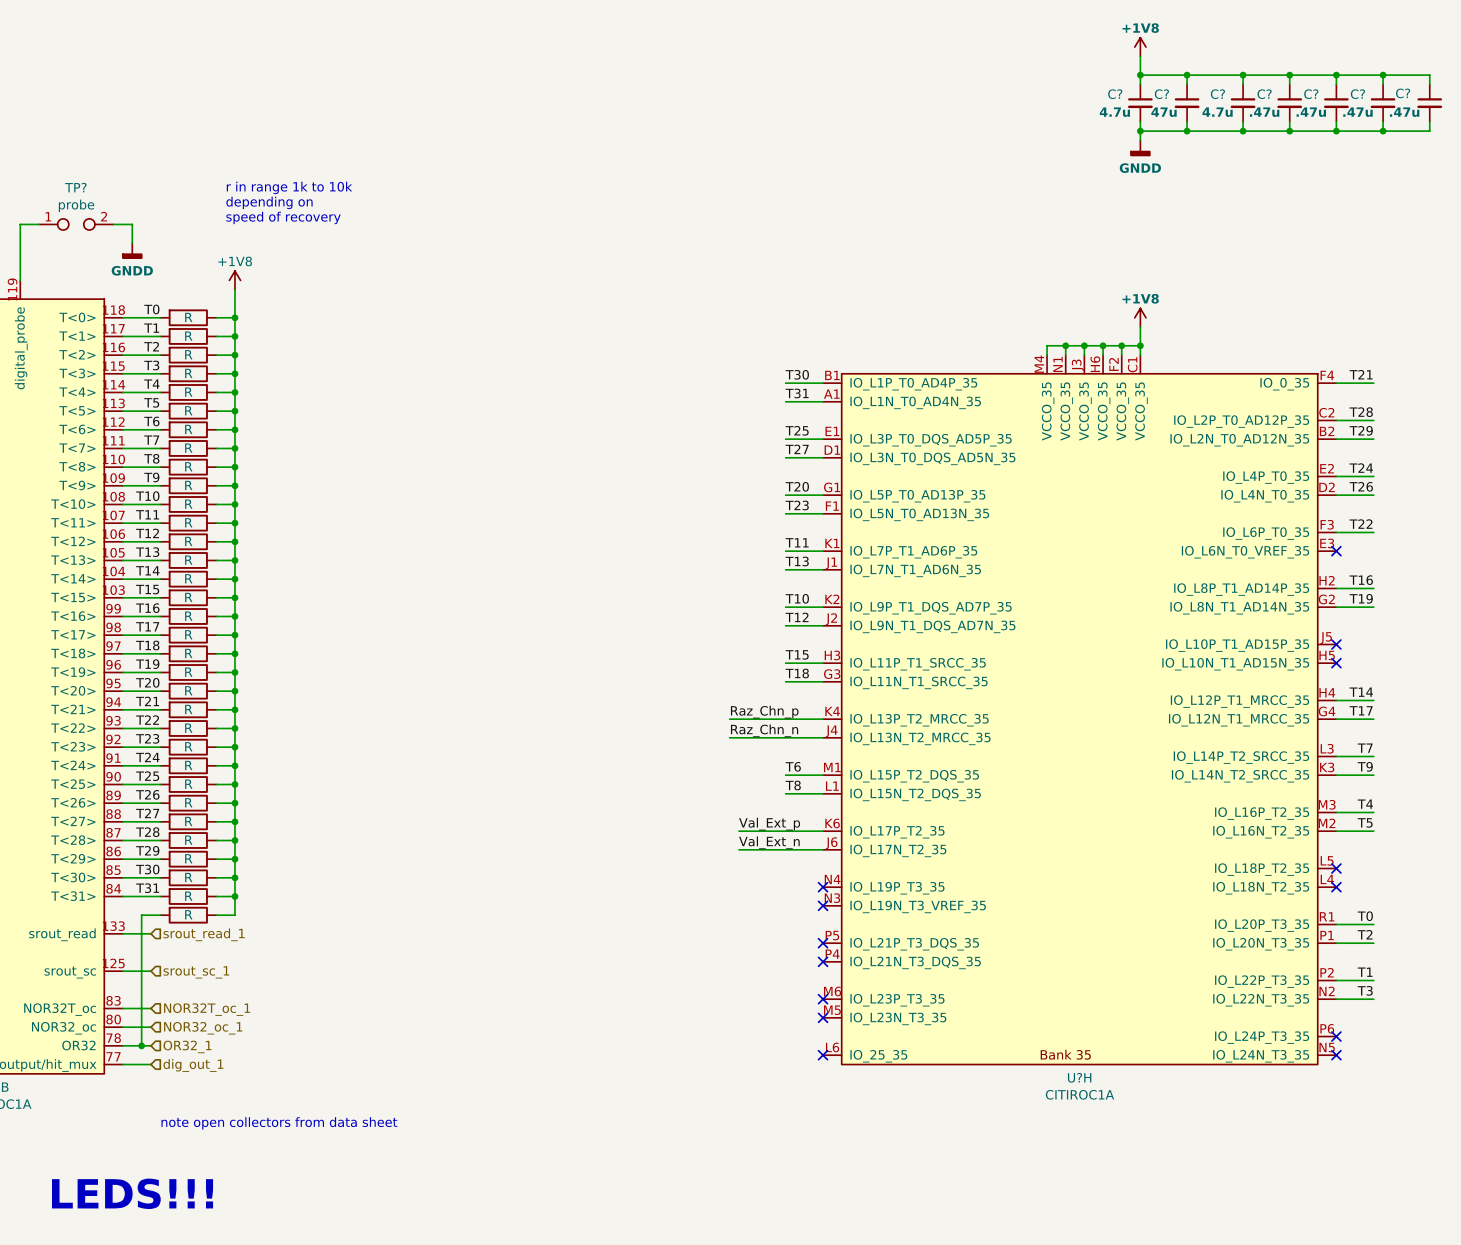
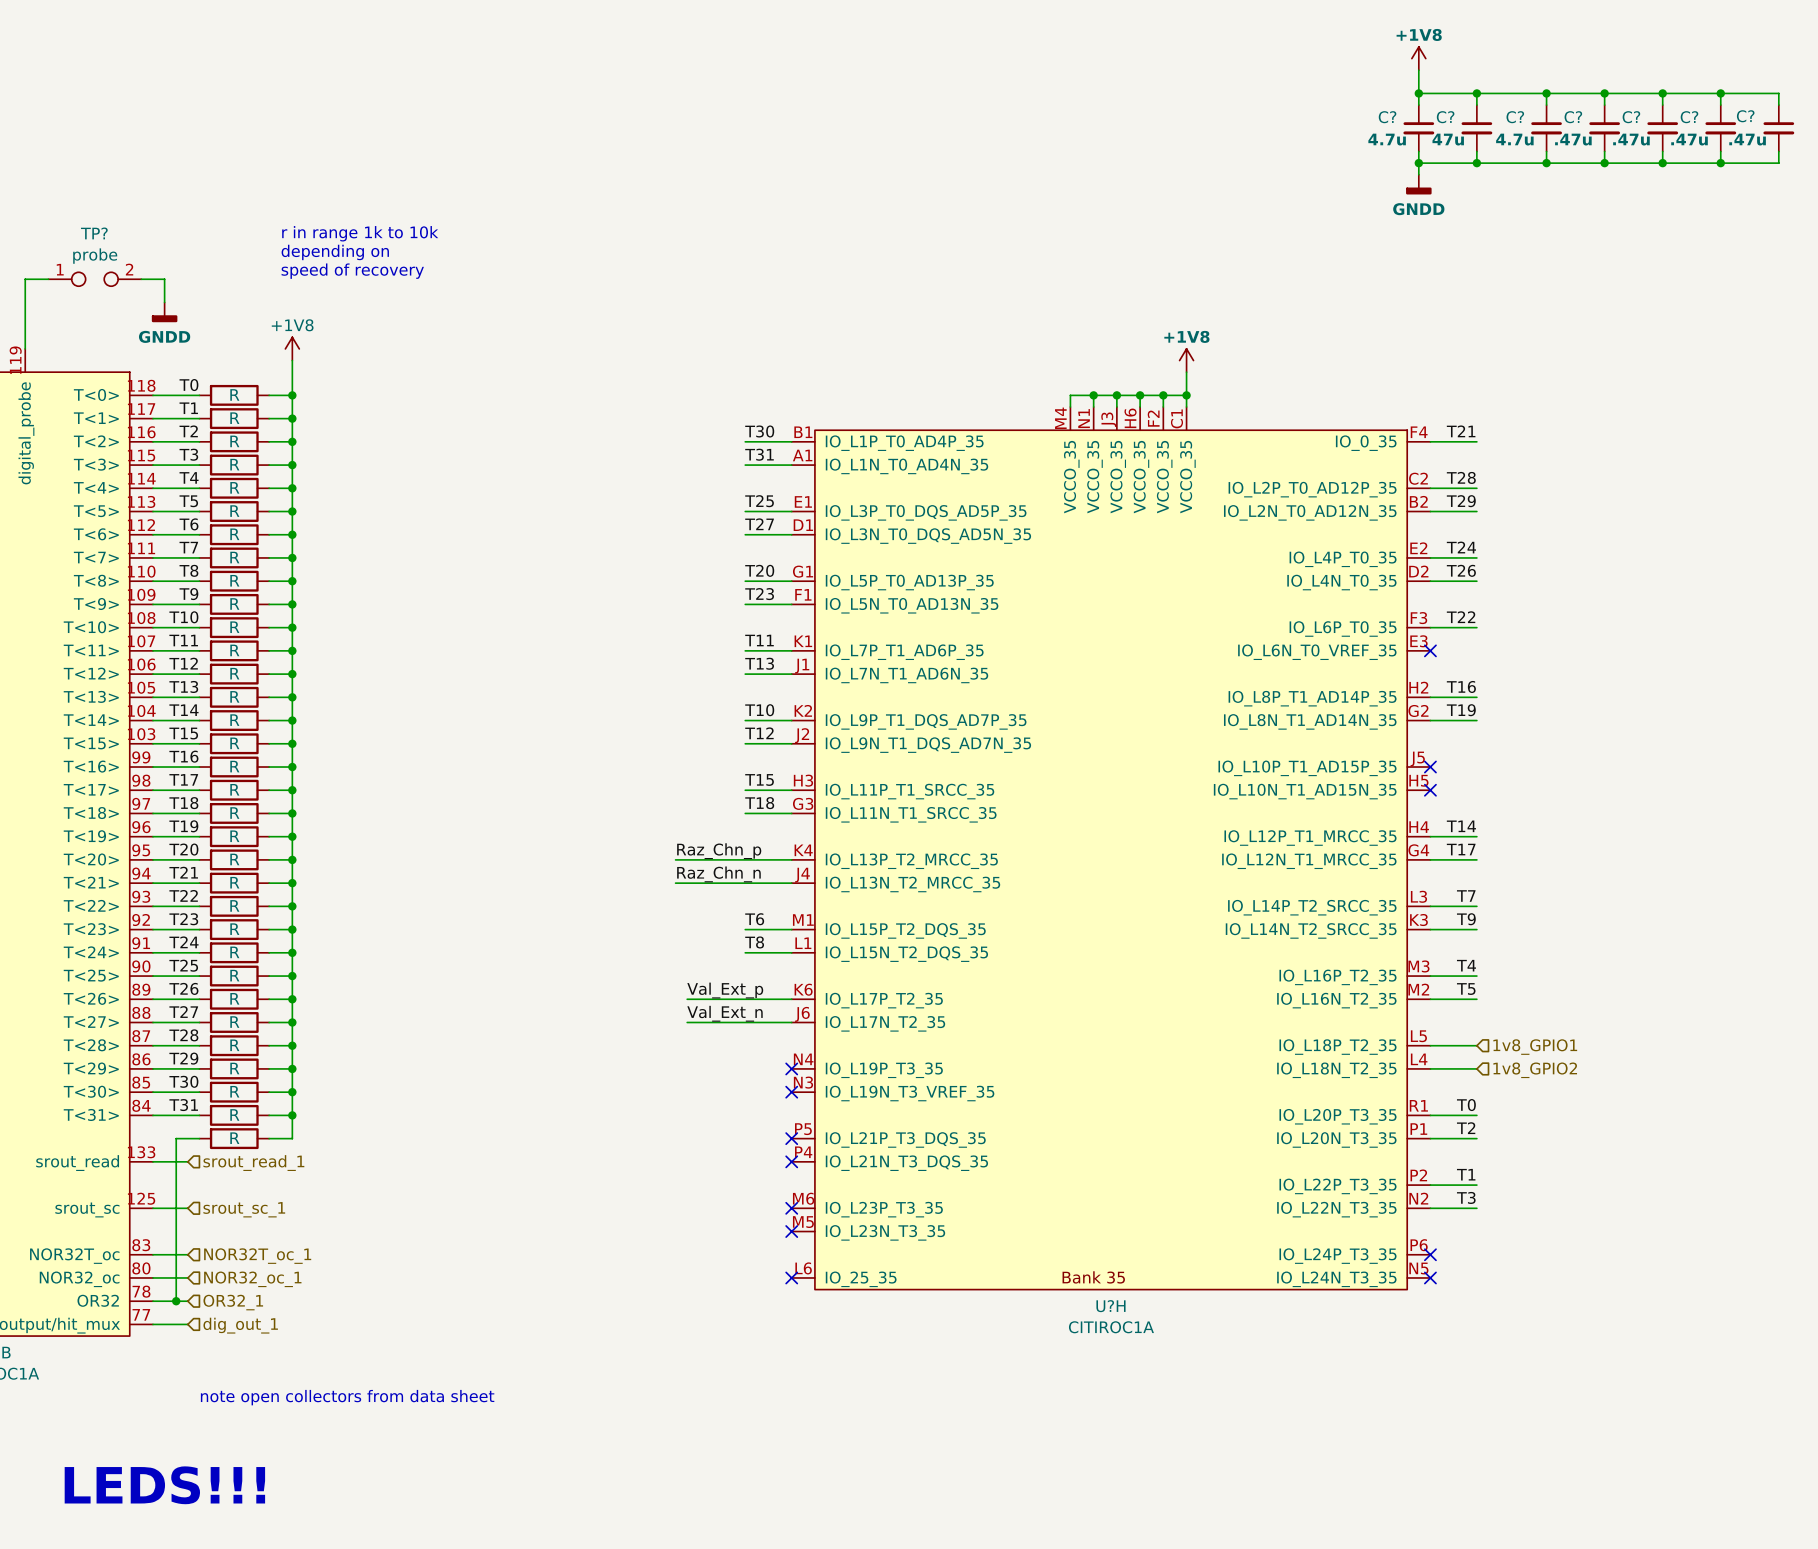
power symbol: none -> +1V8 (1186, 360)
wire: none -> (1186, 372) (1186, 407)
wire: none -> (1093, 395) (1093, 407)
junction: none -> (1093, 395)
junction: none -> (1116, 395)
junction: none -> (1140, 395)
junction: none -> (1163, 395)
wire: none -> (1186, 395) (1070, 395) (1070, 407)
junction: none -> (1186, 395)
power symbol: +1V8 (1140, 317) -> none
wire: (1140, 327) (1140, 355) -> none
junction: (1065, 345) -> none
junction: (1084, 345) -> none
junction: (1103, 345) -> none
junction: (1121, 345) -> none
junction: (1140, 345) -> none
label: none -> T30 (759, 431)
label: none -> T21 (1461, 431)
wire: none -> (745, 441) (791, 441)
wire: none -> (1430, 441) (1476, 441)
label: none -> T31 (759, 454)
wire: none -> (745, 465) (791, 465)
label: T30 (797, 374) -> none
label: T21 (1361, 374) -> none
wire: (1336, 383) (1373, 383) -> none
label: none -> T28 (1461, 477)
label: T31 (797, 393) -> none
label: none -> T25 (759, 501)
label: none -> T29 (1461, 501)
wire: none -> (745, 511) (791, 511)
label: T28 (1361, 412) -> none
wire: (1336, 420) (1373, 420) -> none
label: none -> T27 (759, 524)
wire: none -> (745, 534) (791, 534)
label: T25 (797, 430) -> none
label: T29 (1361, 430) -> none
wire: (1336, 439) (1373, 439) -> none
label: none -> T24 (1461, 547)
label: T27 (797, 449) -> none
label: none -> T20 (759, 570)
label: none -> T26 (1461, 570)
wire: none -> (745, 581) (791, 581)
label: T24 (1361, 468) -> none
wire: (1336, 476) (1373, 476) -> none
label: none -> T23 (759, 594)
wire: none -> (745, 604) (791, 604)
label: T20 (797, 486) -> none
label: T26 (1361, 486) -> none
wire: (1336, 495) (1373, 495) -> none
label: none -> T22 (1461, 617)
label: T23 (797, 505) -> none
label: none -> T11 (759, 640)
wire: none -> (745, 650) (791, 650)
no-connect mark: none -> (1430, 650)
label: T22 (1361, 524) -> none
wire: (1336, 532) (1373, 532) -> none
label: none -> T13 (759, 663)
wire: none -> (745, 674) (791, 674)
label: T11 (797, 542) -> none
no-connect mark: (1336, 551) -> none
label: none -> T16 (1461, 686)
label: T13 (797, 561) -> none
label: none -> T10 (759, 710)
label: none -> T19 (1461, 710)
wire: none -> (745, 720) (791, 720)
label: T16 (1361, 580) -> none
wire: (1336, 588) (1373, 588) -> none
label: none -> T12 (759, 733)
wire: none -> (745, 743) (791, 743)
label: T10 (797, 598) -> none
label: T19 (1361, 598) -> none
wire: (1336, 607) (1373, 607) -> none
no-connect mark: none -> (1430, 767)
label: T12 (797, 617) -> none
label: none -> T15 (759, 779)
wire: none -> (745, 790) (791, 790)
no-connect mark: none -> (1430, 790)
no-connect mark: (1336, 644) -> none
label: none -> T18 (759, 803)
wire: none -> (745, 813) (791, 813)
label: T15 (797, 654) -> none
no-connect mark: (1336, 663) -> none
label: none -> T14 (1461, 826)
label: T18 (797, 673) -> none
U?H: none -> CITIROC1A (1111, 848)
label: none -> T17 (1461, 849)
label: none -> Raz_Chn_p (719, 851)
wire: none -> (675, 859) (791, 859)
label: T14 (1361, 692) -> none
wire: (1336, 700) (1373, 700) -> none
label: none -> Raz_Chn_n (718, 874)
wire: none -> (675, 883) (791, 883)
U?H: CITIROC1A (1079, 709) -> none
label: T17 (1361, 710) -> none
label: Raz_Chn_p (764, 712) -> none
wire: (1336, 719) (1373, 719) -> none
label: none -> T7 (1466, 896)
label: Raz_Chn_n (764, 730) -> none
label: none -> T6 (754, 919)
label: none -> T9 (1466, 919)
wire: none -> (745, 929) (791, 929)
label: T7 (1365, 748) -> none
wire: (1336, 756) (1373, 756) -> none
label: none -> T8 (754, 942)
wire: none -> (745, 952) (791, 952)
label: T6 (793, 766) -> none
label: T9 (1365, 766) -> none
wire: (1336, 775) (1373, 775) -> none
label: none -> T4 (1466, 965)
label: T8 (793, 785) -> none
label: none -> T5 (1466, 989)
label: none -> Val_Ext_p (725, 990)
wire: none -> (687, 999) (791, 999)
label: T4 (1365, 804) -> none
wire: (1336, 812) (1373, 812) -> none
label: none -> Val_Ext_n (725, 1013)
wire: none -> (687, 1022) (791, 1022)
label: T5 (1365, 822) -> none
label: Val_Ext_p (769, 824) -> none
wire: (1336, 831) (1373, 831) -> none
hierarchical label: none -> 1v8_GPIO1 (1535, 1047)
label: Val_Ext_n (769, 842) -> none
no-connect mark: none -> (791, 1068)
hierarchical label: none -> 1v8_GPIO2 (1535, 1070)
no-connect mark: (1336, 868) -> none
no-connect mark: none -> (791, 1092)
no-connect mark: (823, 887) -> none
no-connect mark: (1336, 887) -> none
label: none -> T0 (1466, 1105)
no-connect mark: (823, 905) -> none
label: none -> T2 (1466, 1128)
no-connect mark: none -> (791, 1138)
label: T0 (1365, 916) -> none
wire: (1336, 924) (1373, 924) -> none
no-connect mark: none -> (791, 1161)
label: T2 (1365, 934) -> none
no-connect mark: (823, 943) -> none
wire: (1336, 943) (1373, 943) -> none
label: none -> T1 (1466, 1174)
no-connect mark: (823, 961) -> none
label: none -> T3 (1466, 1197)
no-connect mark: none -> (791, 1208)
label: T1 (1365, 972) -> none
wire: (1336, 980) (1373, 980) -> none
no-connect mark: none -> (791, 1231)
label: T3 (1365, 990) -> none
no-connect mark: (823, 999) -> none
wire: (1336, 999) (1373, 999) -> none
no-connect mark: none -> (1430, 1254)
no-connect mark: (823, 1017) -> none
no-connect mark: none -> (791, 1277)
no-connect mark: none -> (1430, 1277)
no-connect mark: (1336, 1036) -> none
no-connect mark: (823, 1055) -> none
no-connect mark: (1336, 1055) -> none

